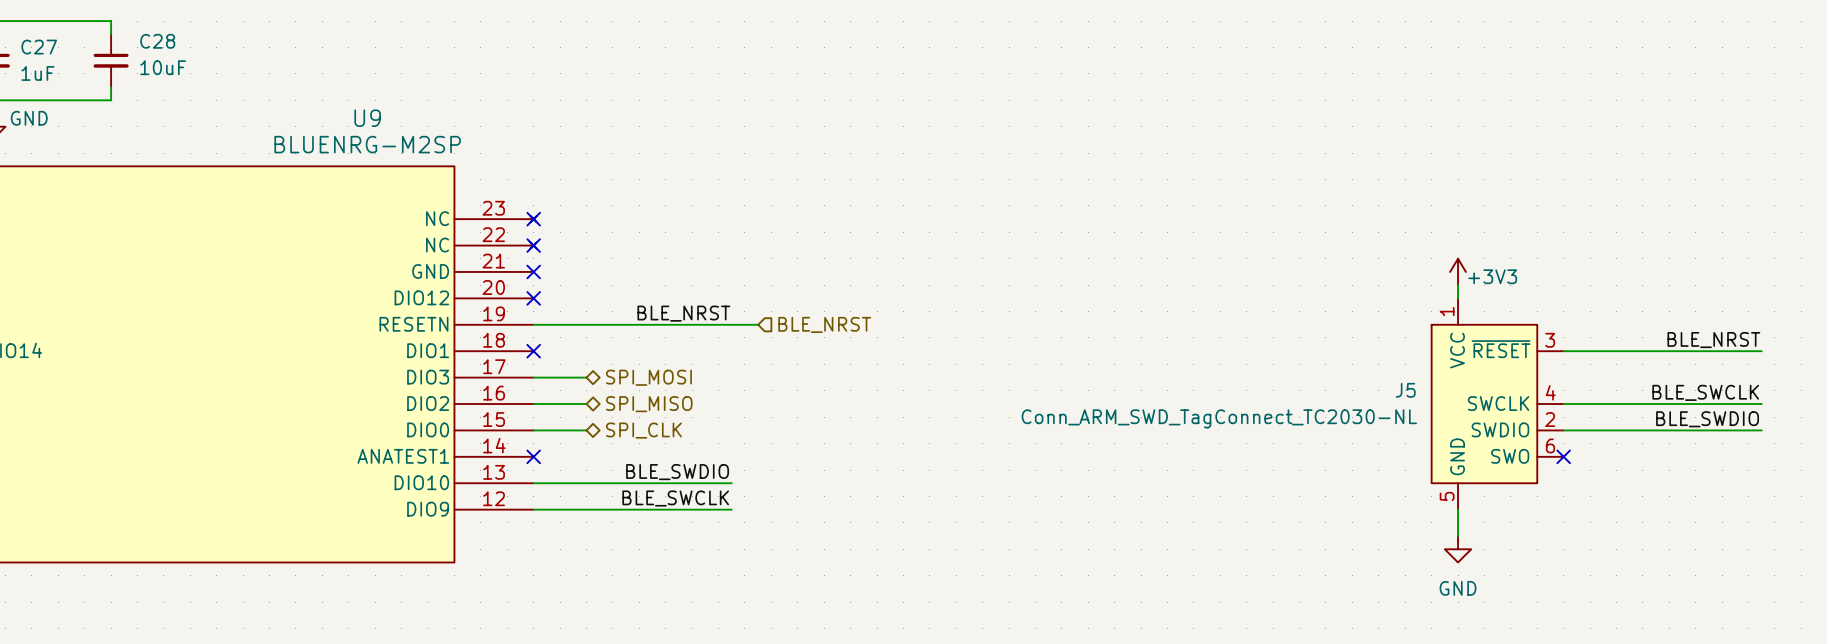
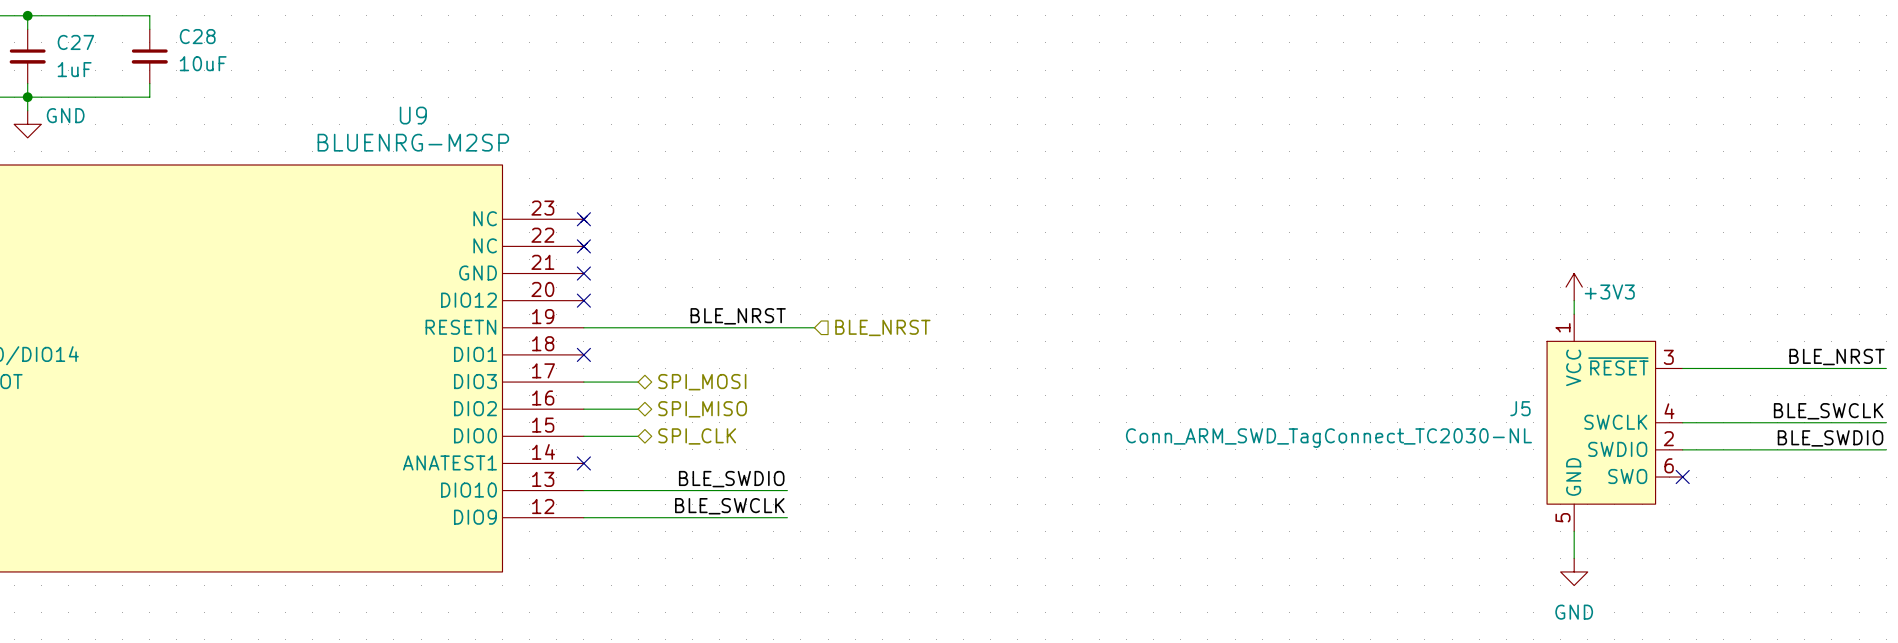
power symbol position: +3V3 (1458, 271) -> +3V3 (1574, 287)
wire: (1458, 285) (1458, 298) -> (1574, 300) (1574, 314)
label position: BLE_NRST (1713, 340) -> BLE_NRST (1837, 357)
wire: (1563, 351) (1761, 351) -> (1682, 368) (1886, 368)
label position: BLE_SWCLK (1705, 392) -> BLE_SWCLK (1828, 411)
J5 position: (1497, 404) -> (1614, 422)
wire: (1563, 404) (1761, 404) -> (1682, 422) (1886, 422)
label position: BLE_SWDIO (1707, 419) -> BLE_SWDIO (1830, 438)
wire: (1563, 430) (1761, 430) -> (1682, 449) (1886, 449)
no-connect mark position: (1563, 456) -> (1682, 477)
wire: (1458, 509) (1458, 536) -> (1574, 531) (1574, 558)
power symbol position: GND (1458, 549) -> GND (1574, 571)

